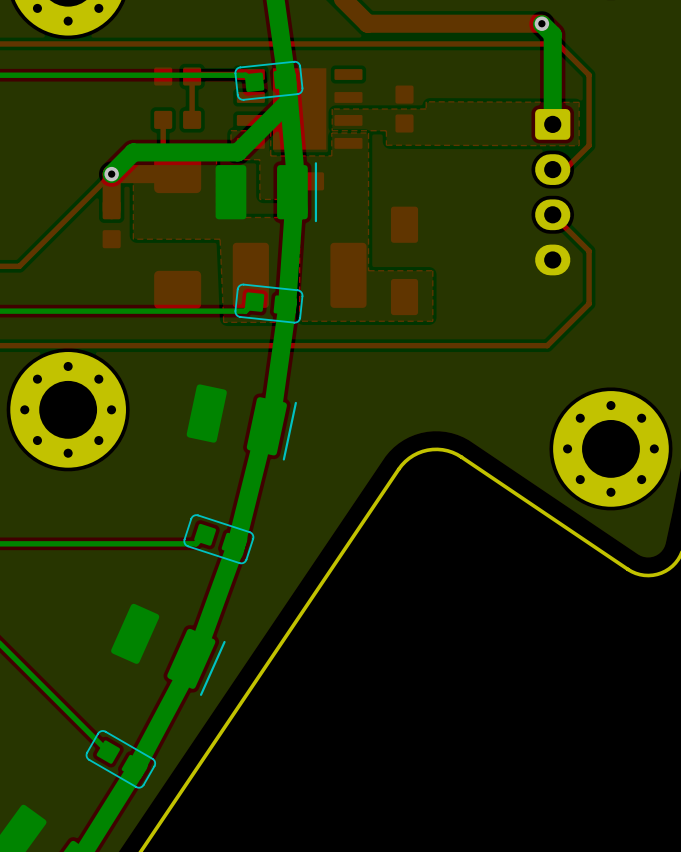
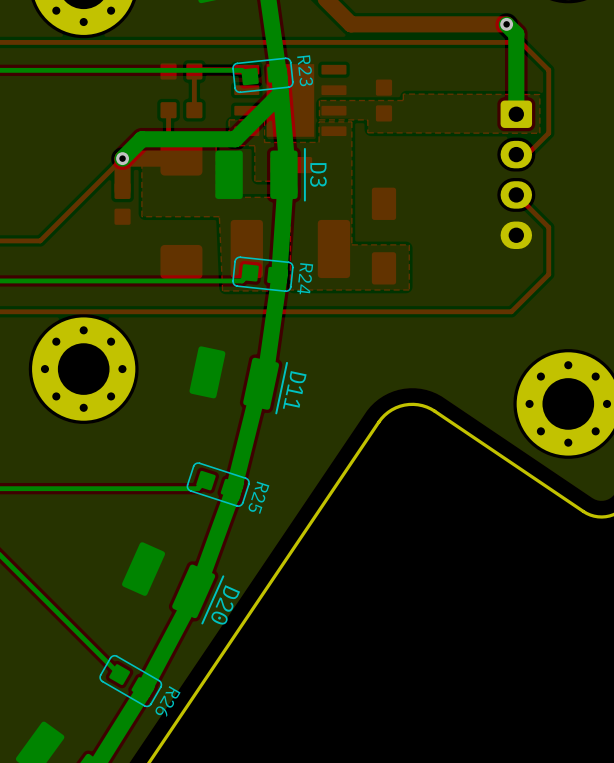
R23 name: none -> R23 (305, 70)
D3 name: none -> D3 (318, 174)
R24 name: none -> R24 (305, 278)
D11 name: none -> D11 (294, 389)
R25 name: none -> R25 (258, 497)
D20 name: none -> D20 (225, 604)
R26 name: none -> R26 (168, 701)

